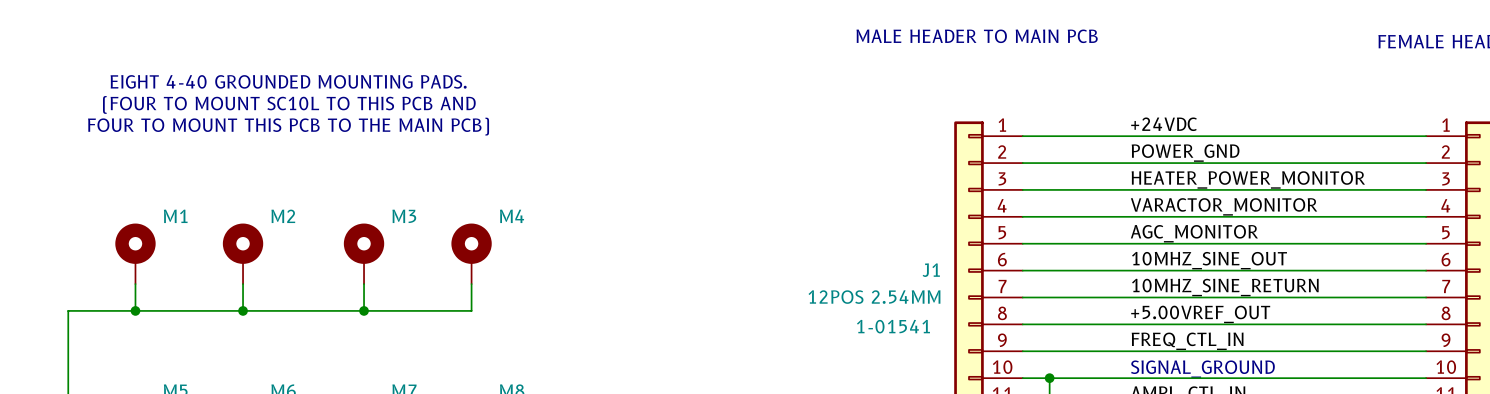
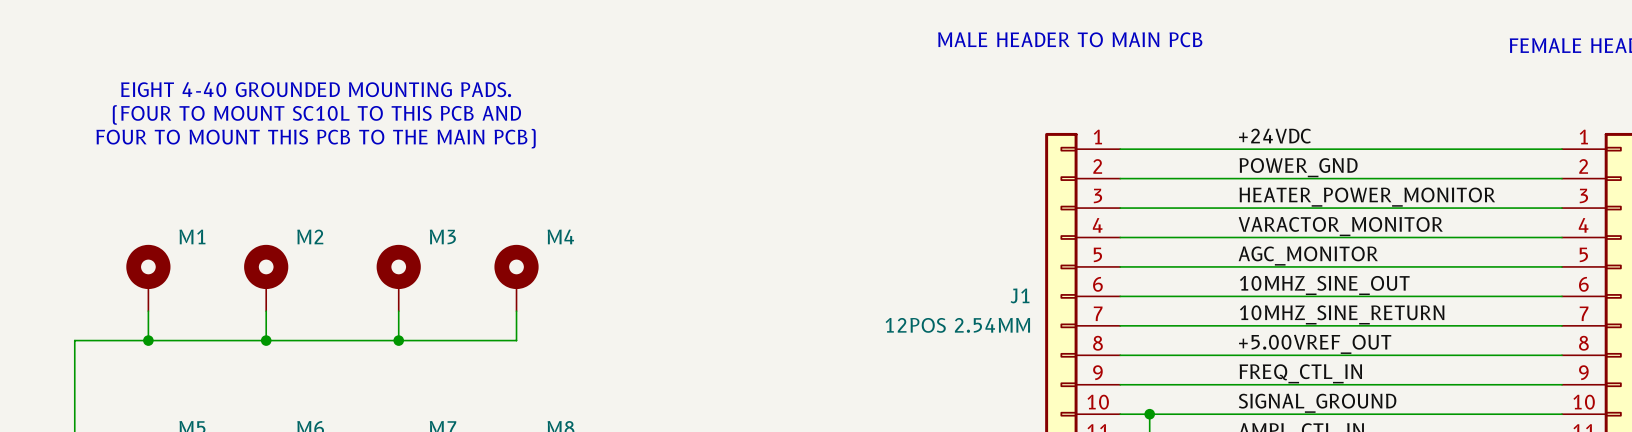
J1 text: 1-01541 (893, 326) -> none
label: none -> SIGNAL_GROUND (1317, 403)
text: SIGNAL_GROUND (1202, 369) -> none

